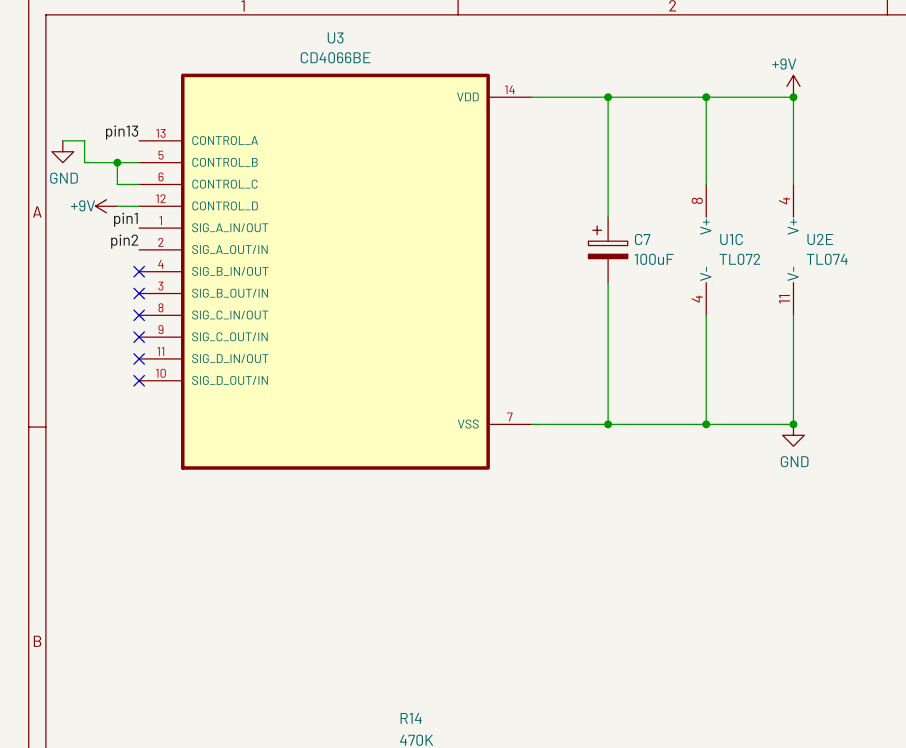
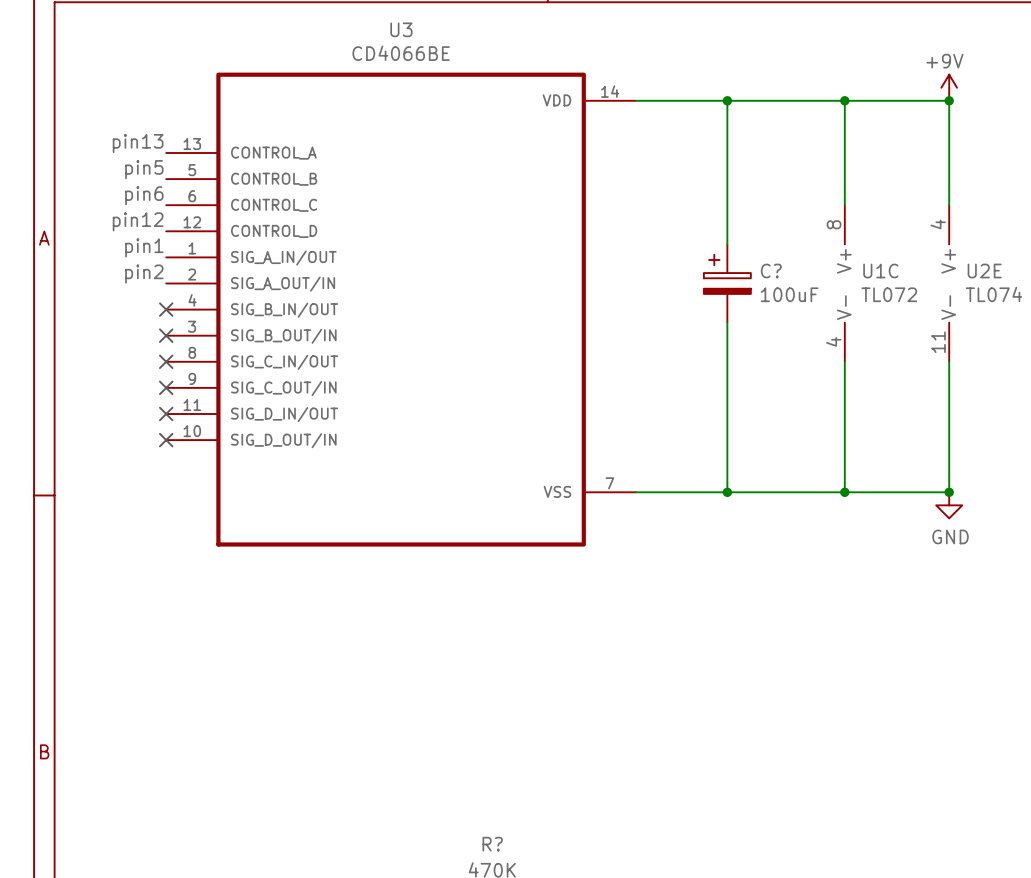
wire: (62, 140) (84, 140) (84, 162) (139, 162) -> none
power symbol: GND (62, 151) -> none
label: none -> pin5 (144, 169)
wire: (117, 162) (117, 184) (139, 184) -> none
junction: (117, 162) -> none
label: none -> pin6 (144, 195)
label: none -> pin12 (138, 221)
power symbol: +9V (106, 206) -> none
wire: (117, 206) (139, 206) -> none
C7 name: C7 (642, 239) -> C? (771, 271)
R14 name: R14 (411, 718) -> R? (492, 844)

